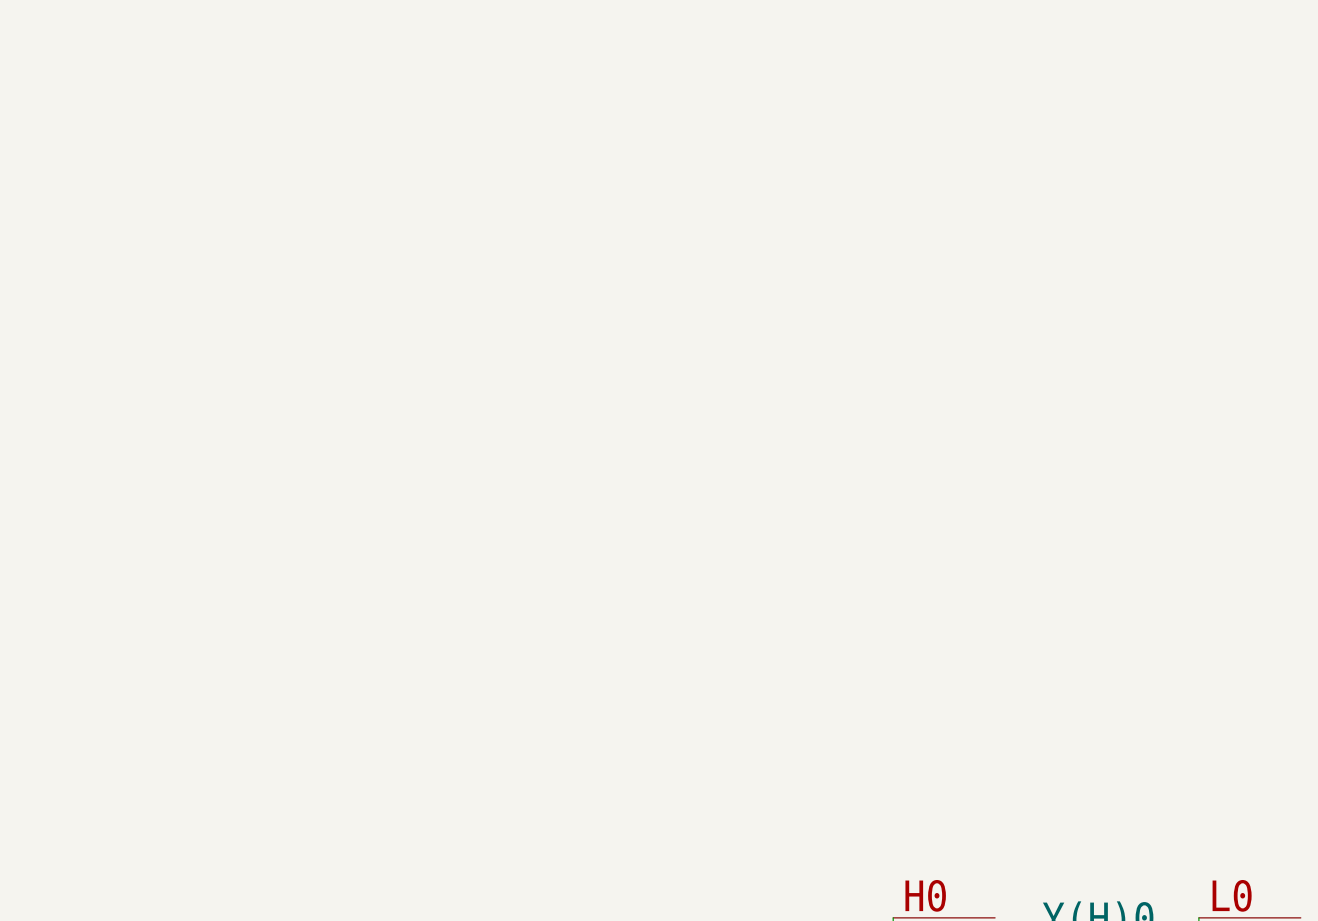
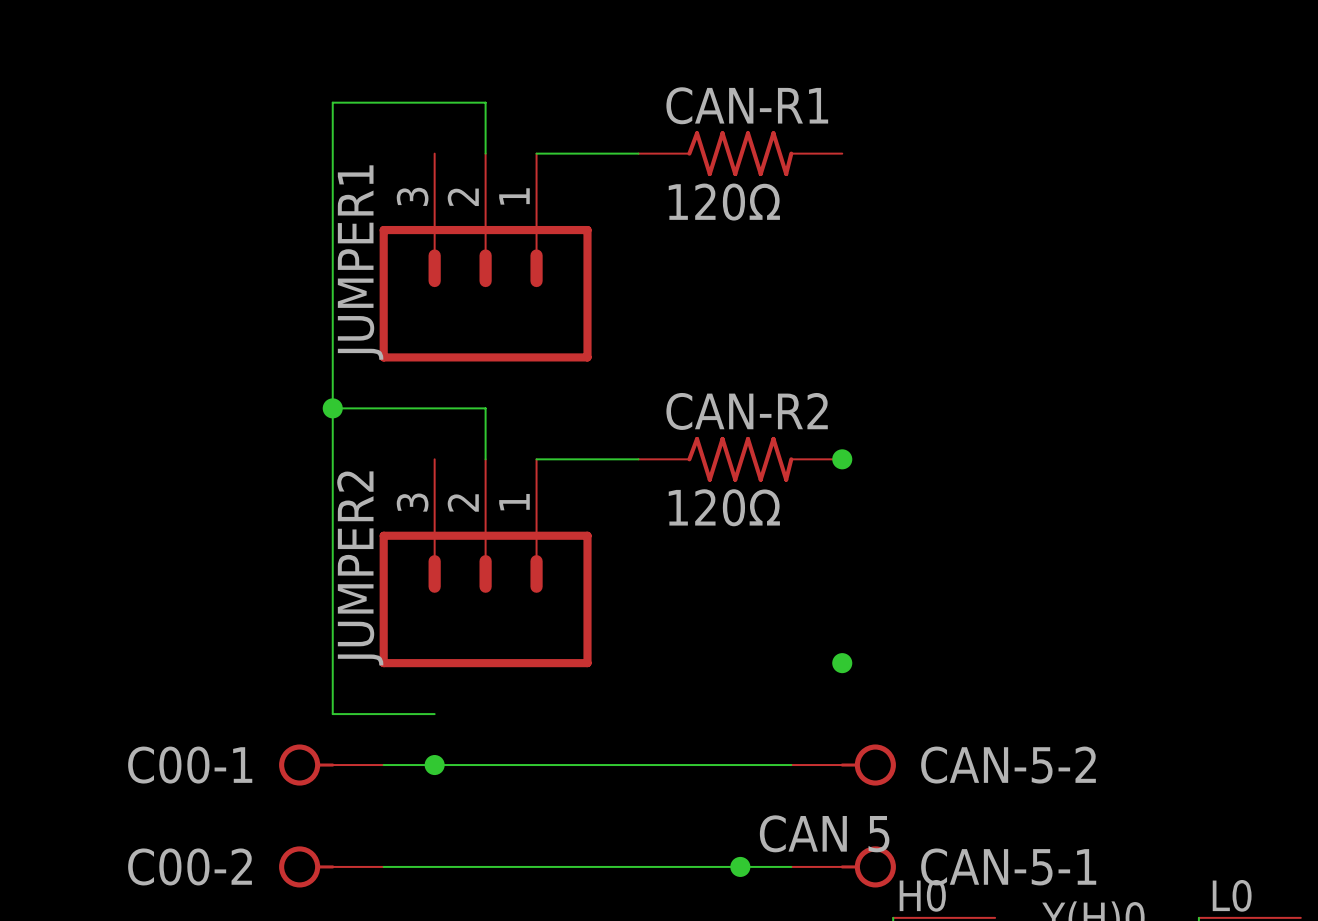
wire: none -> (485, 153) (485, 102) (332, 102) (332, 714) (434, 714)
wire: none -> (536, 153) (638, 153)
CAN-R1: none -> 120Ω (740, 153)
JUMPER1: none -> (485, 257)
wire: none -> (332, 408) (485, 408) (485, 459)
junction: none -> (332, 408)
wire: none -> (536, 459) (638, 459)
CAN-R2: none -> 120Ω (740, 459)
junction: none -> (842, 459)
JUMPER2: none -> (485, 563)
junction: none -> (842, 663)
C00-1: none -> (331, 765)
wire: none -> (383, 765) (791, 765)
junction: none -> (434, 765)
CAN-5-2: none -> CAN 5 (843, 765)
C00-2: none -> (331, 866)
wire: none -> (383, 866) (791, 866)
junction: none -> (740, 866)
CAN-5-1: none -> (843, 866)

